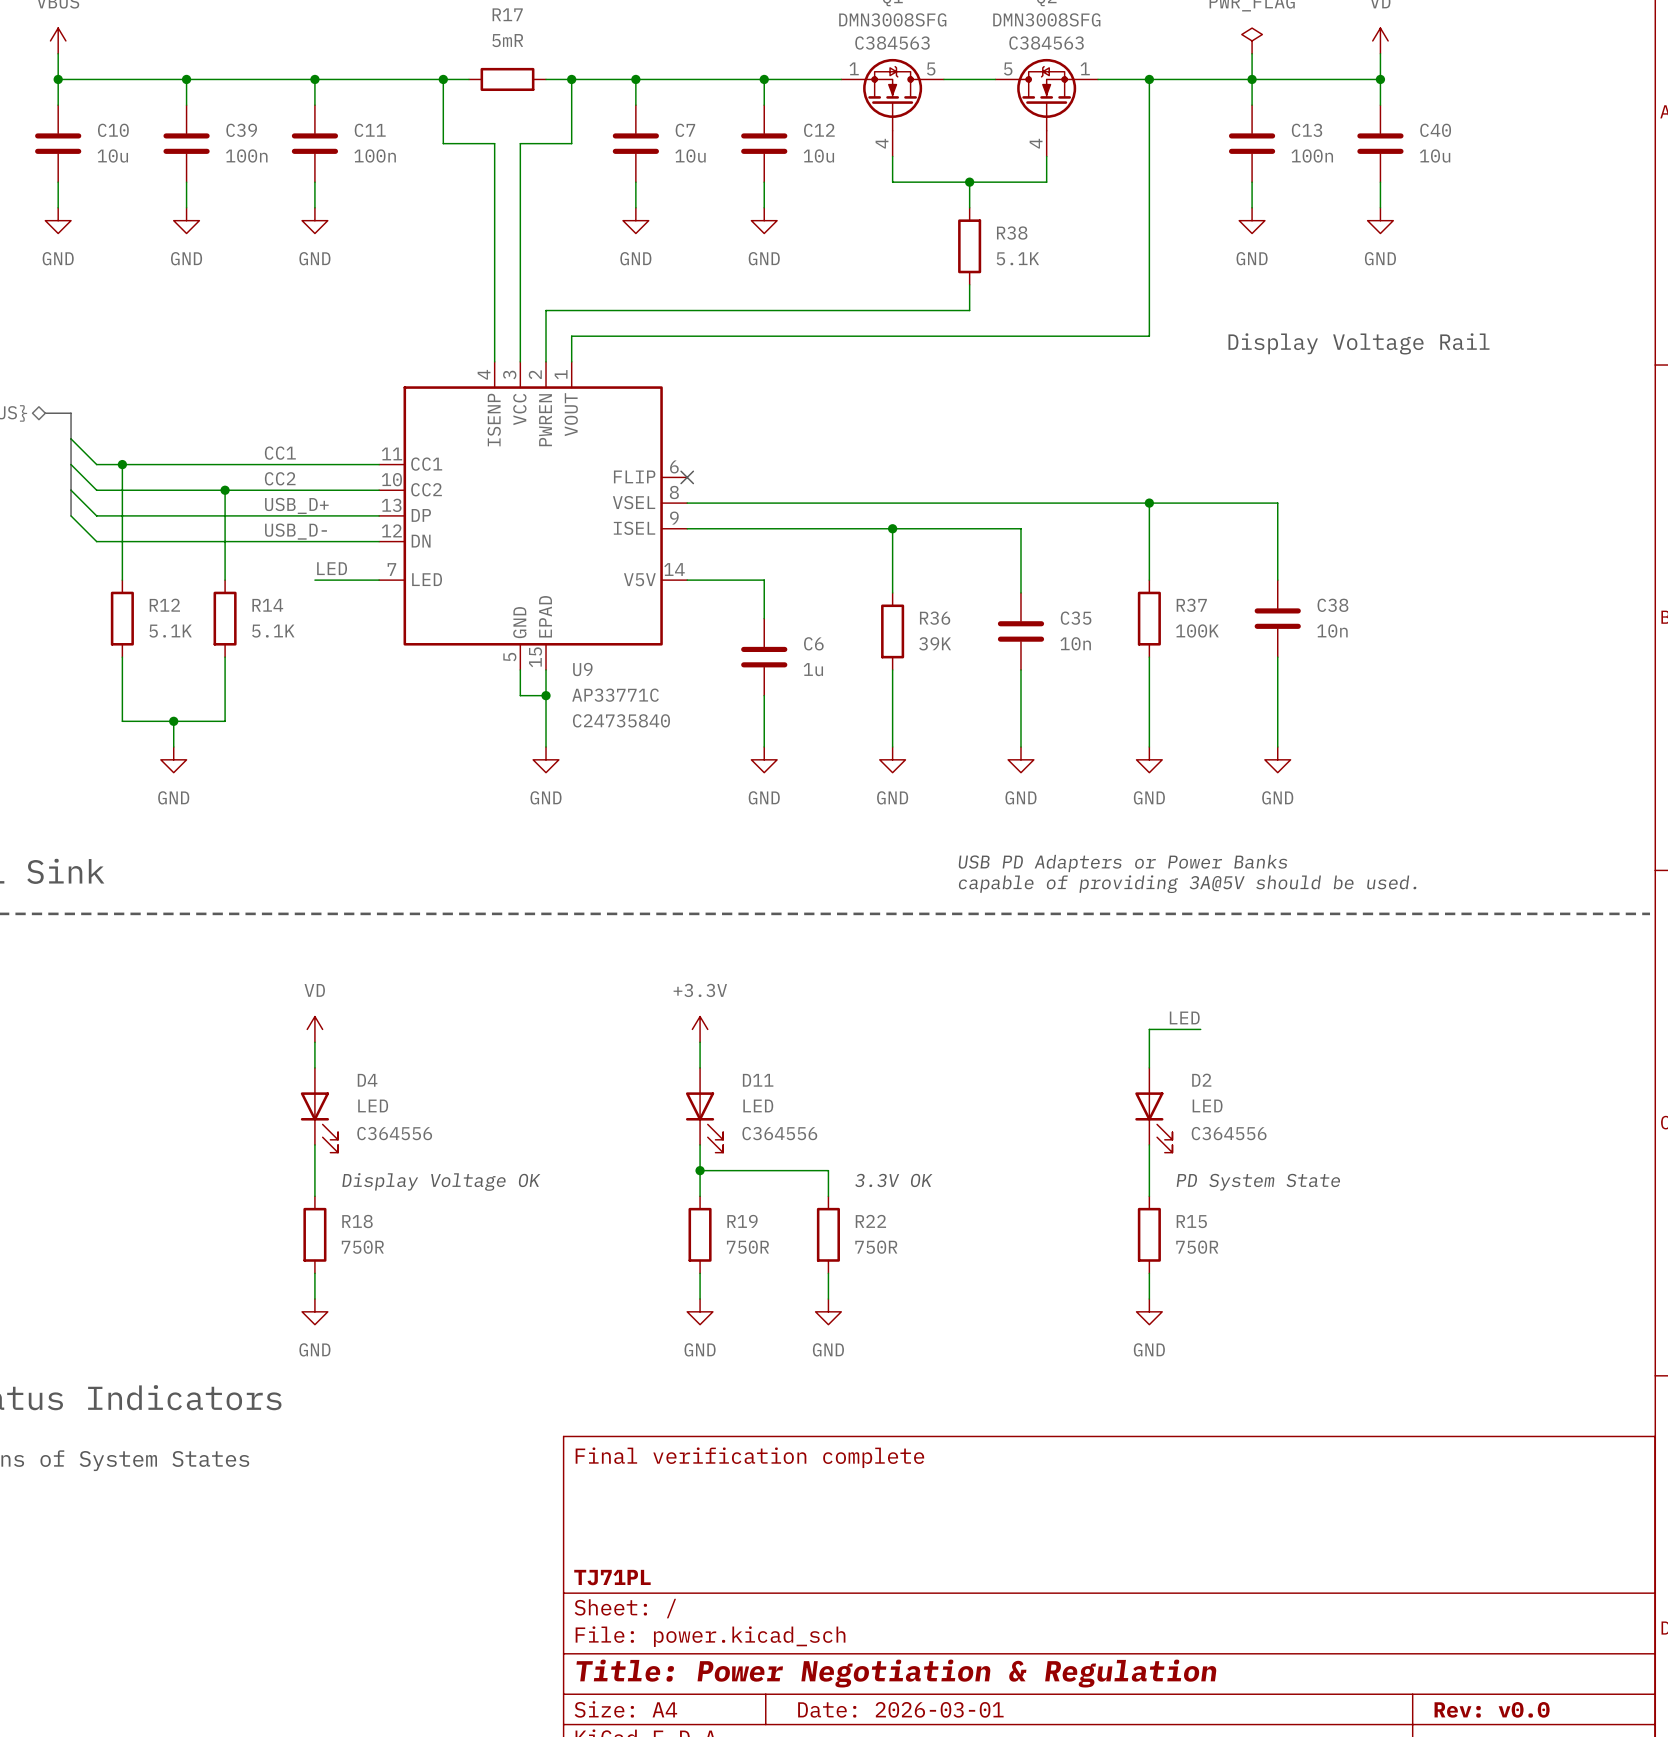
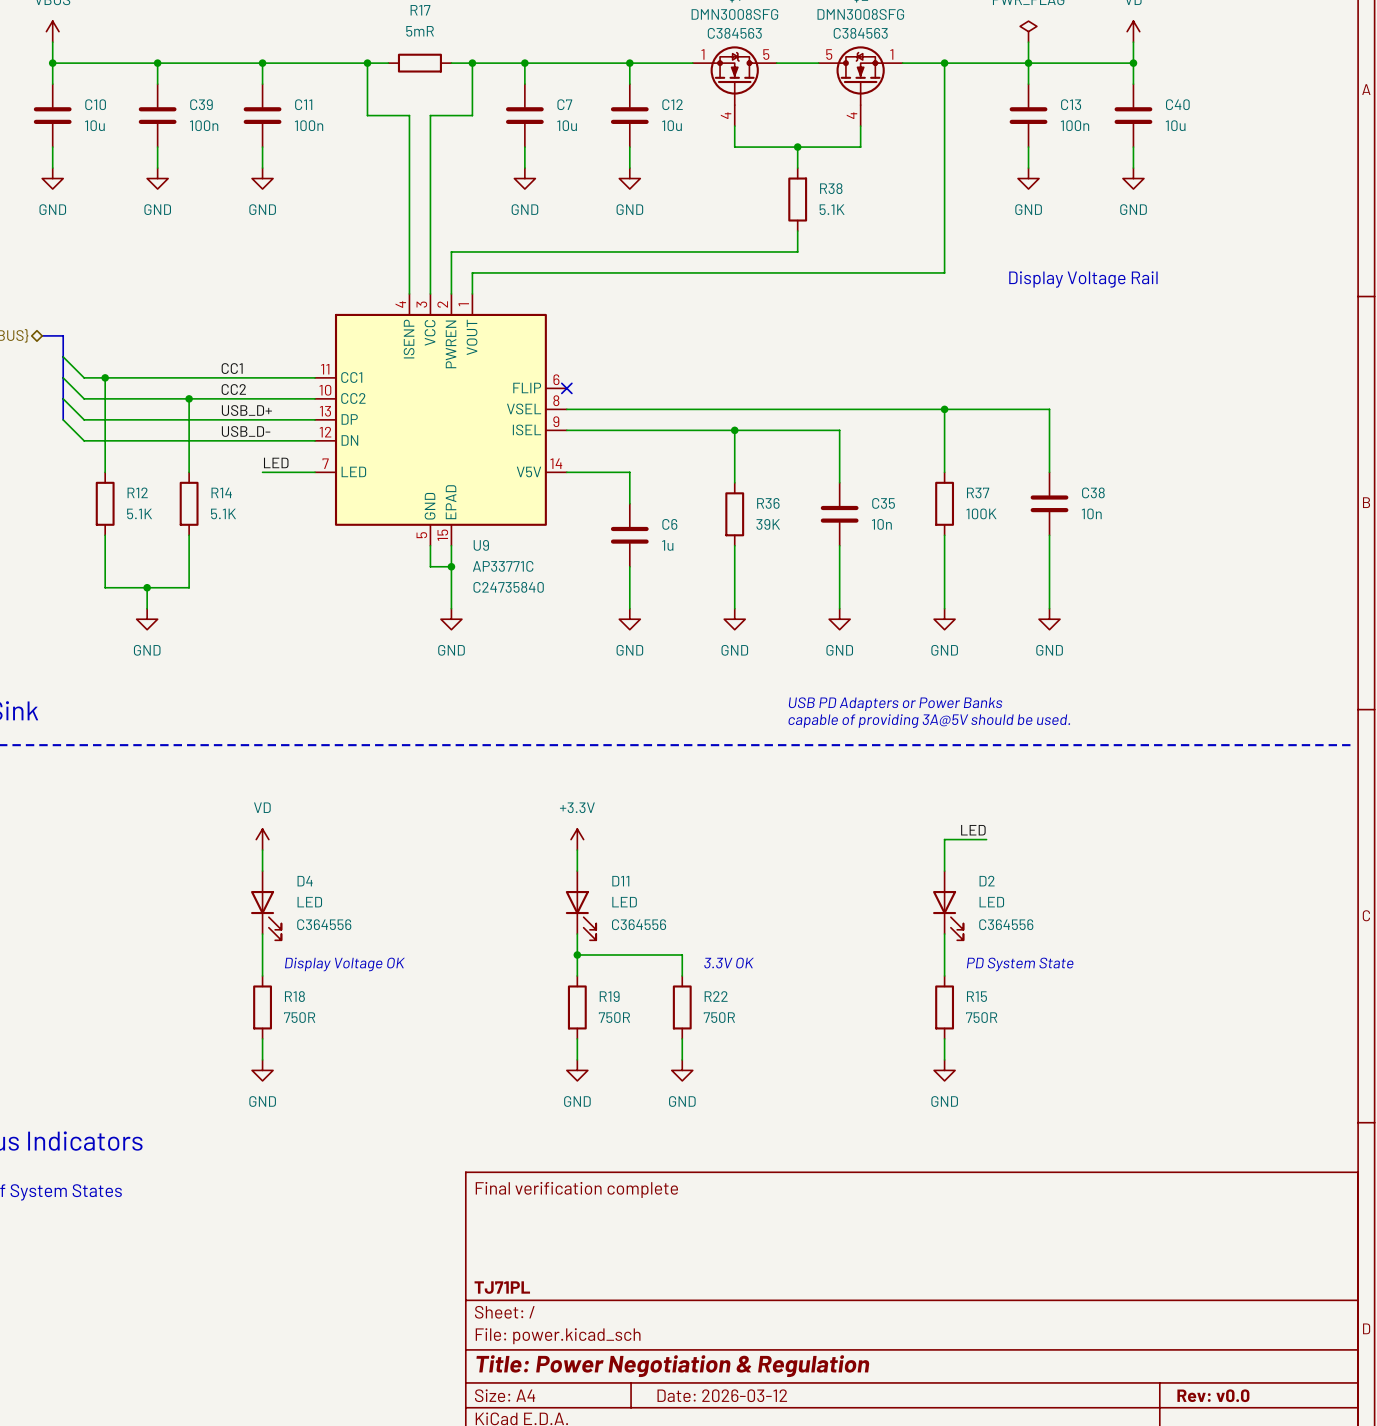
title block: Date: 2026-03-01 (900, 1709) -> Date: 2026-03-12 (722, 1395)

